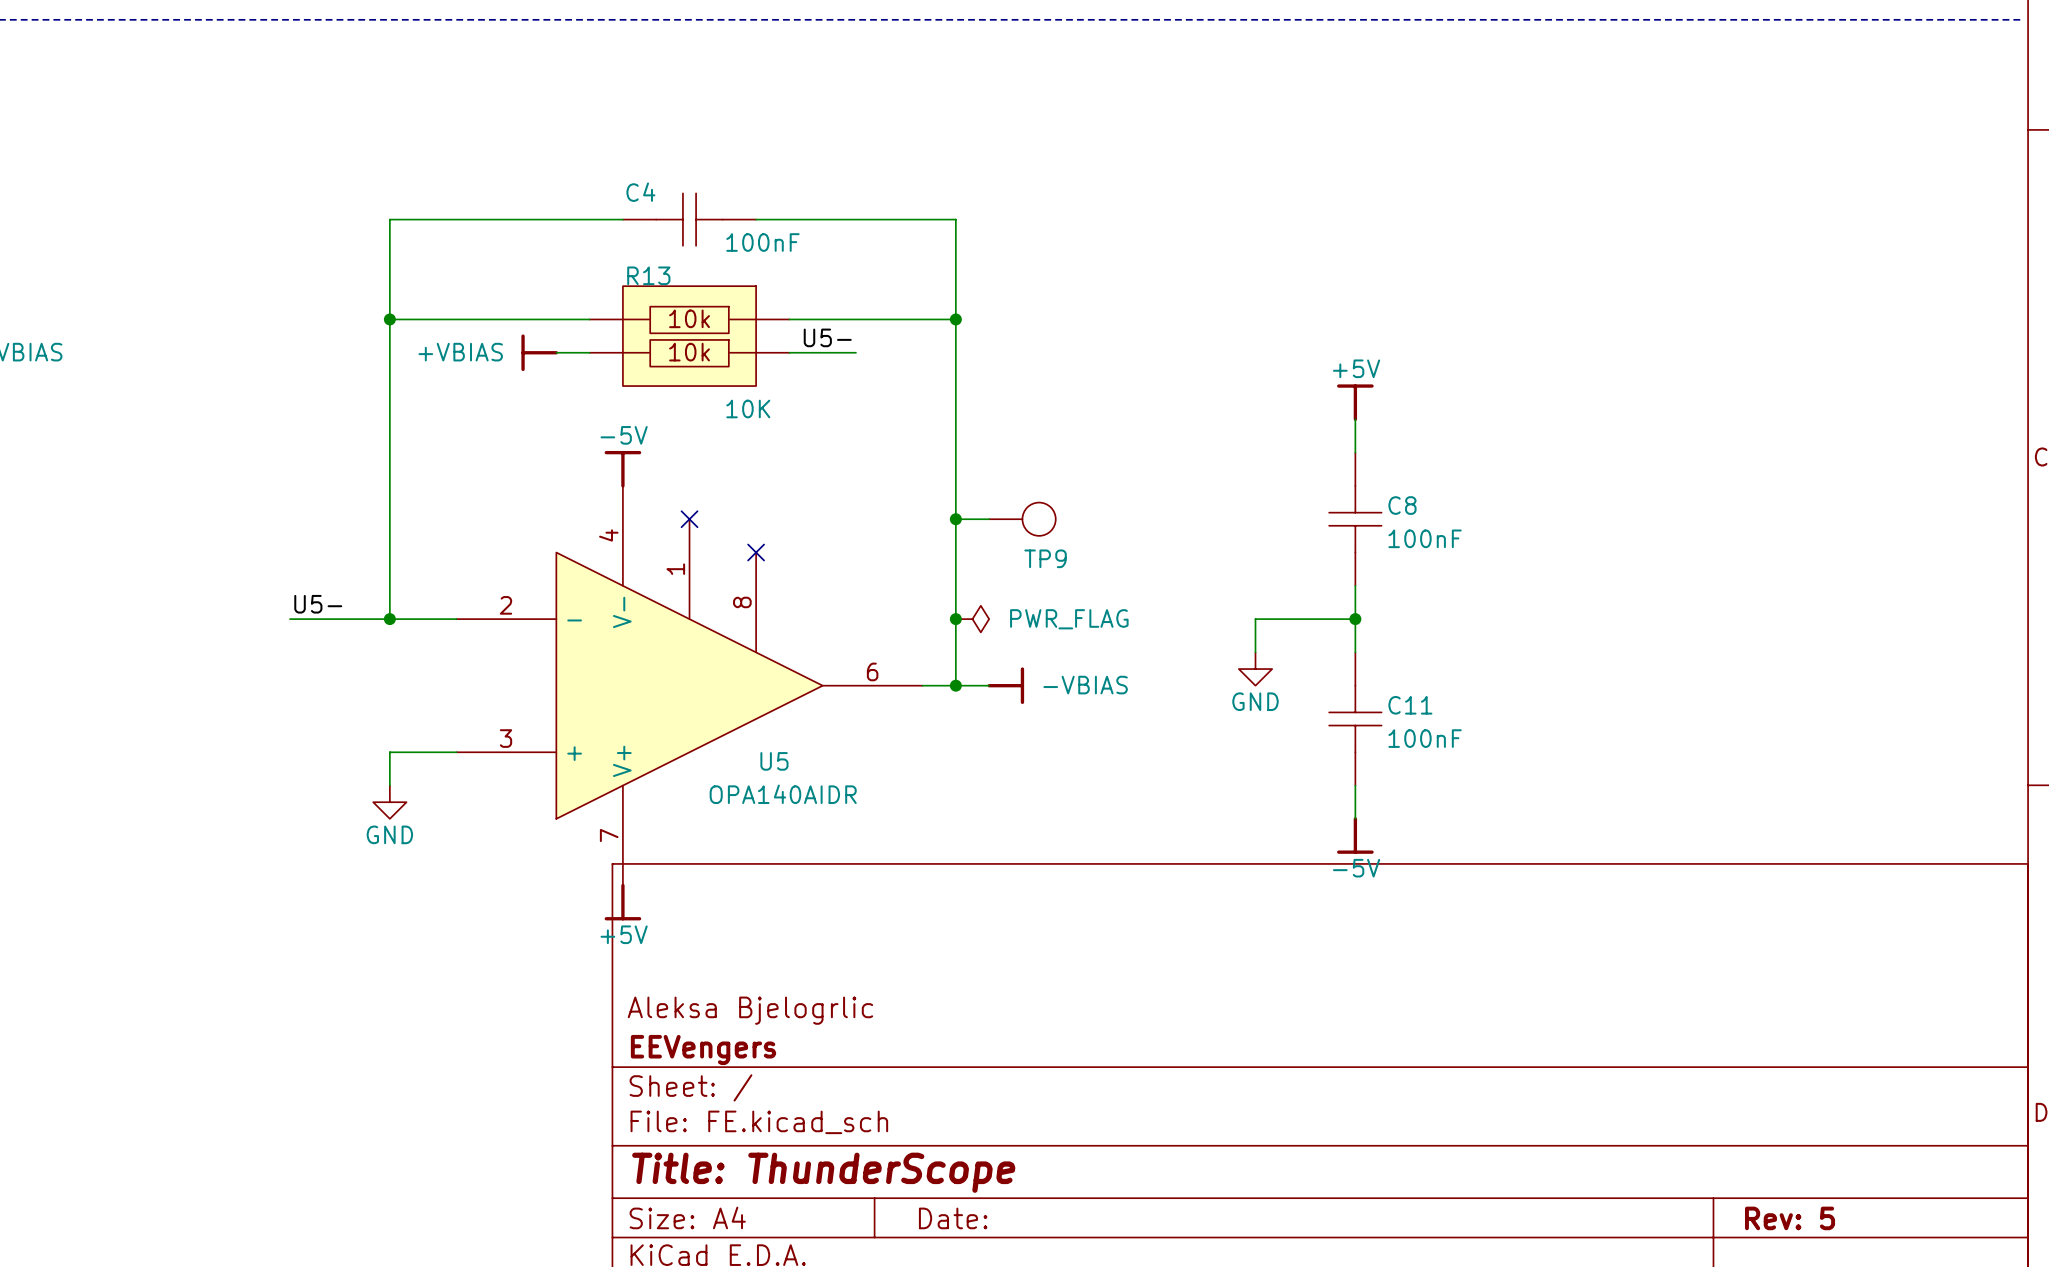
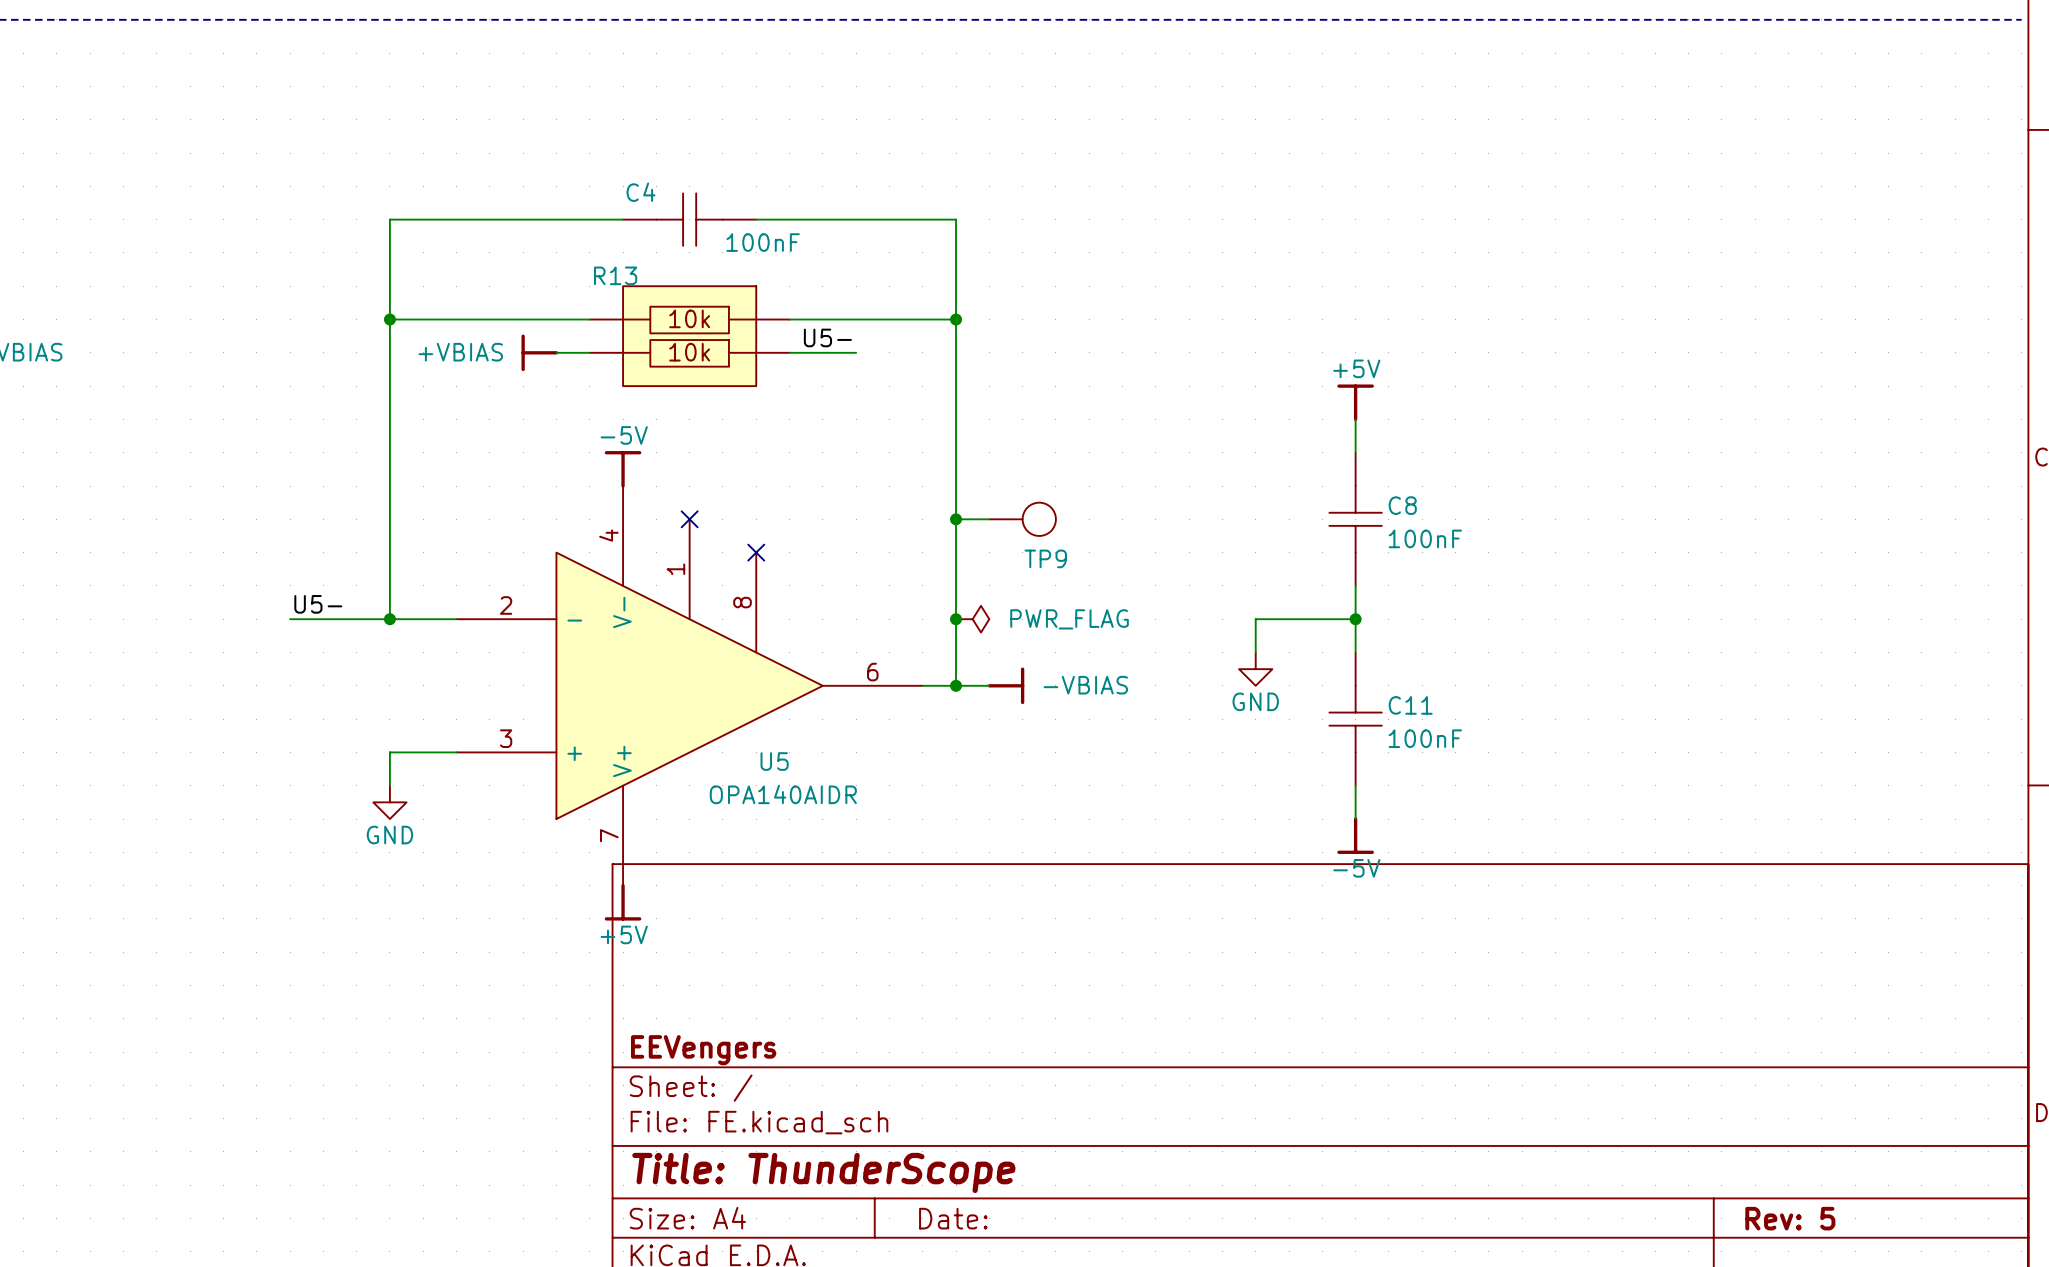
R13 name position: R13 (648, 275) -> R13 (615, 275)
R13 value: 10K (748, 408) -> none
title block: Aleksa Bjelogrlic (750, 1010) -> none

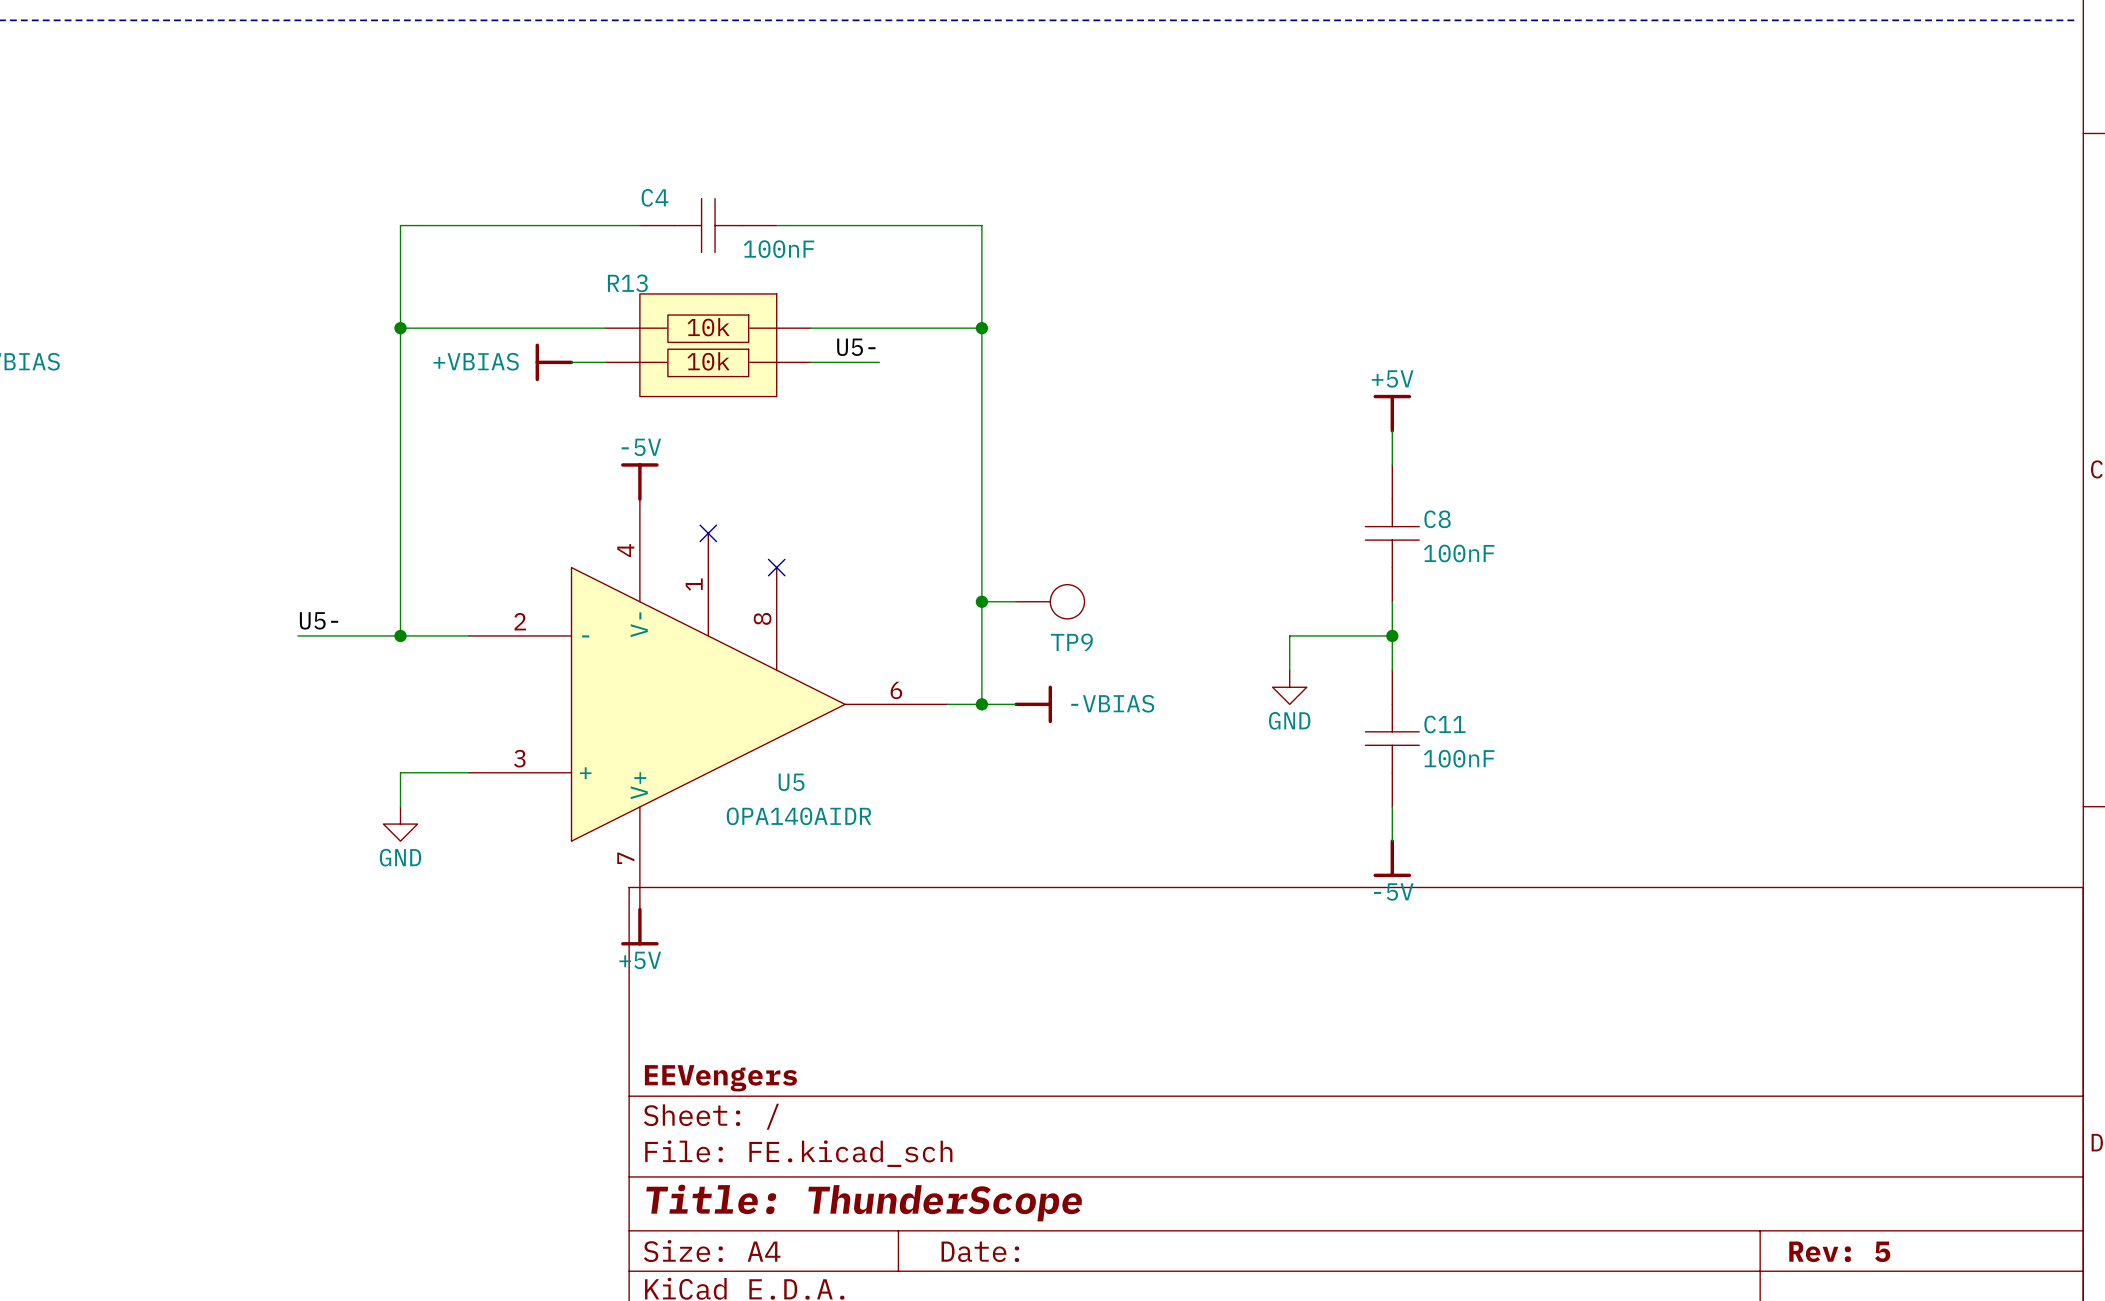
wire: (956, 519) (989, 519) -> (981, 601) (1016, 601)
junction: (956, 519) -> none
TP9 position: (1022, 519) -> (1050, 601)
junction: none -> (981, 601)
junction: (956, 619) -> none
power symbol: PWR_FLAG (972, 619) -> none

